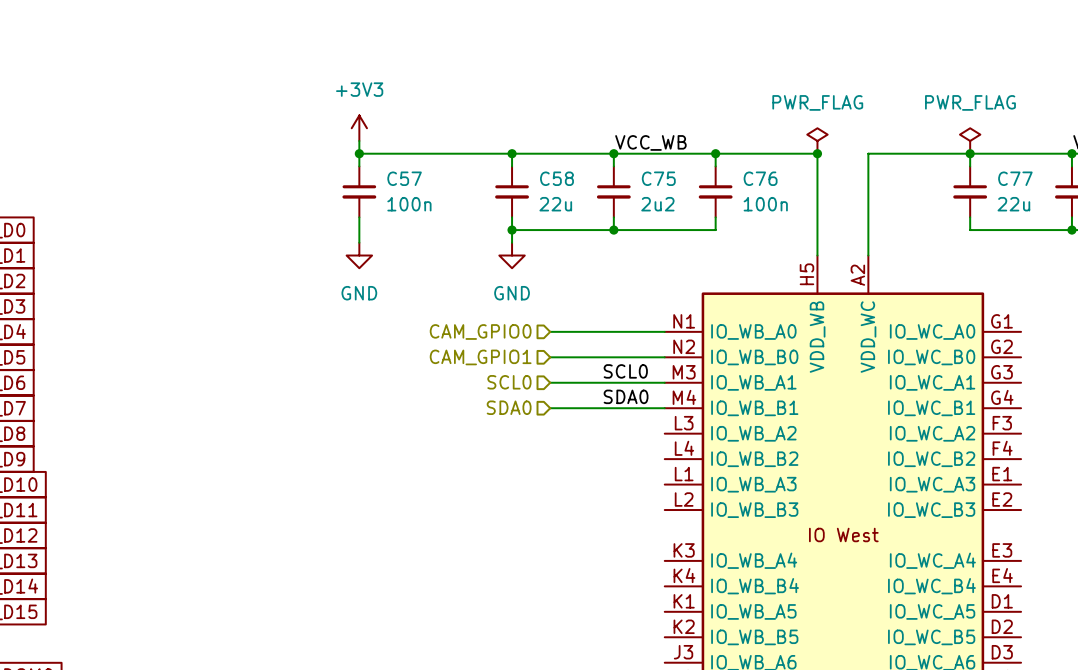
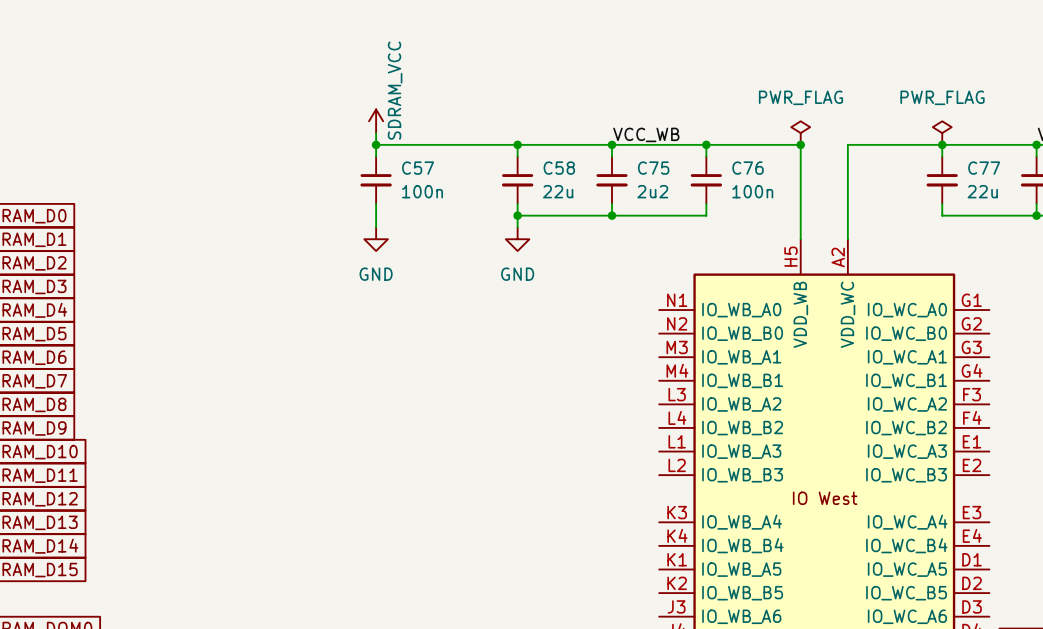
power symbol: +3V3 (359, 128) -> SDRAM_VCC (376, 121)
hierarchical label: CAM_GPIO0 (480, 331) -> none
wire: (550, 331) (664, 331) -> none
hierarchical label: CAM_GPIO1 (480, 357) -> none
wire: (550, 357) (664, 357) -> none
label: SCL0 (625, 371) -> none
hierarchical label: SCL0 (509, 382) -> none
wire: (550, 382) (664, 382) -> none
label: SDA0 (626, 396) -> none
hierarchical label: SDA0 (509, 407) -> none
wire: (550, 408) (664, 408) -> none

